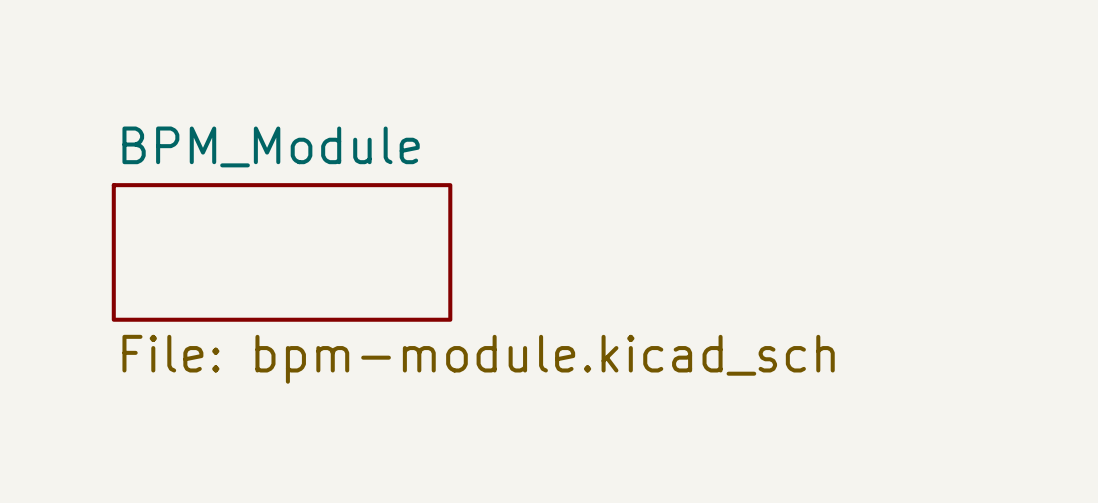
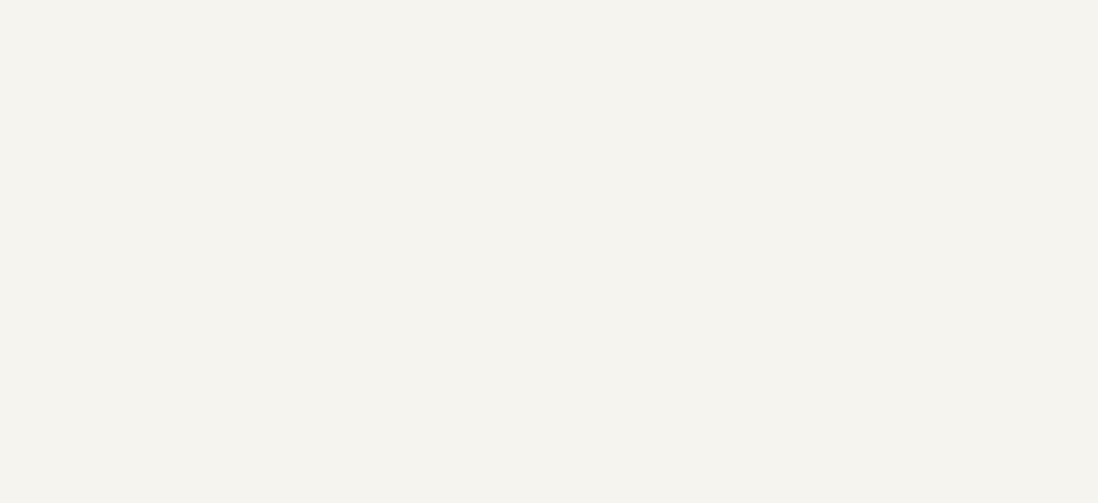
sheet BPM_Module: File: bpm-module.kicad_sch (282, 252) -> none

